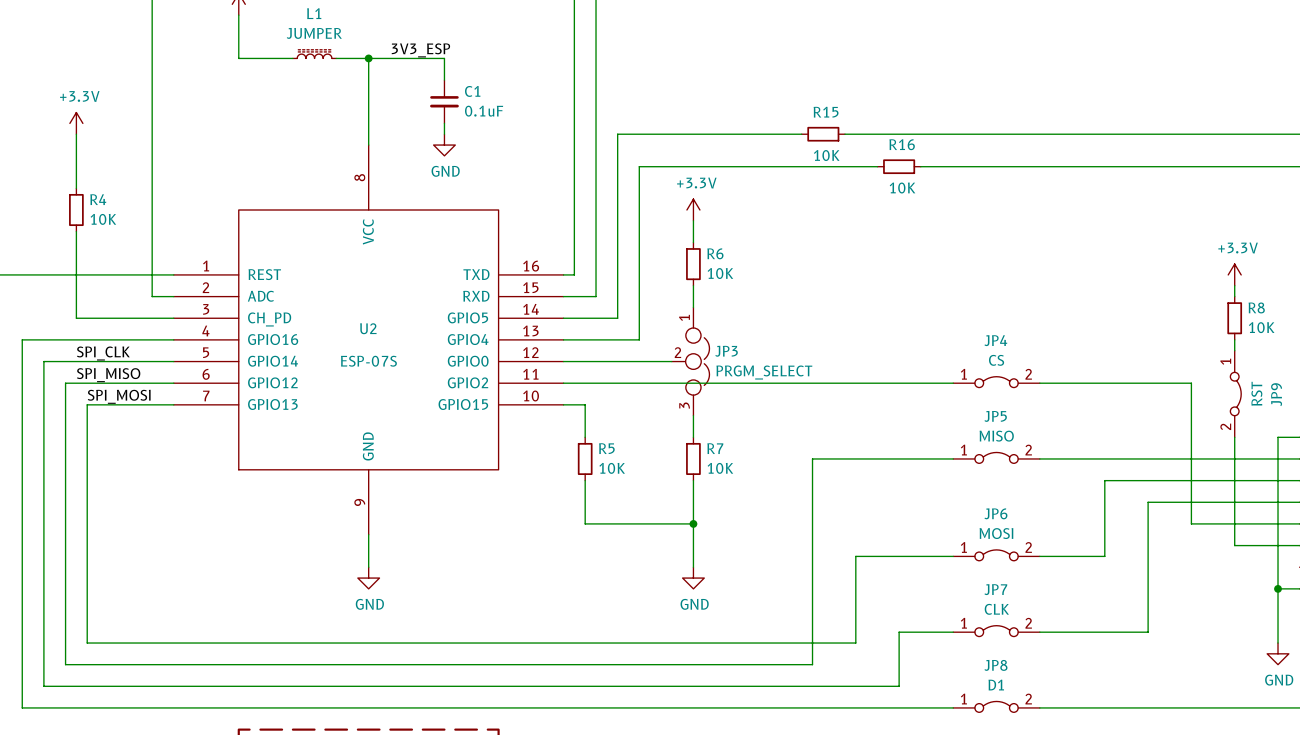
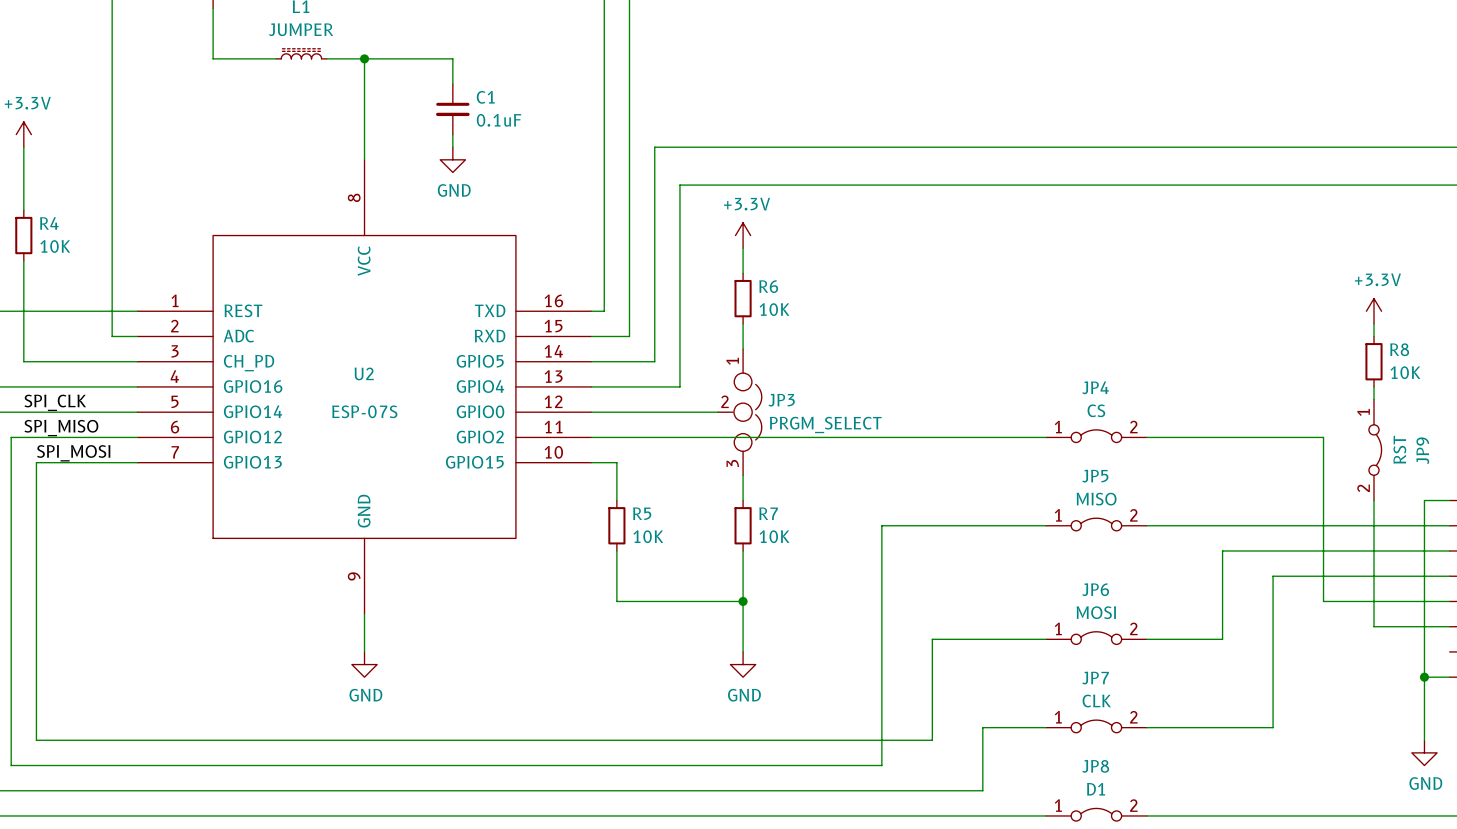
label: 3V3_ESP (420, 50) -> none
wire: none -> (869, 147) (919, 147)
R15: 10K (823, 134) -> none
wire: none -> (957, 185) (1008, 185)
R16: 10K (899, 166) -> none

